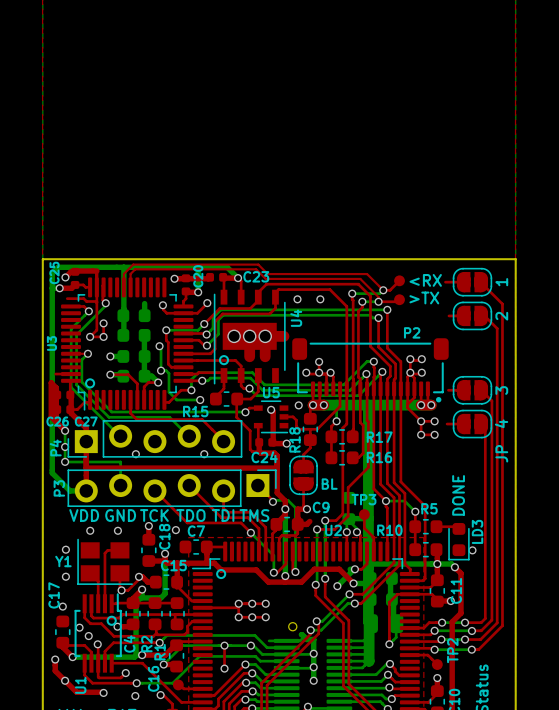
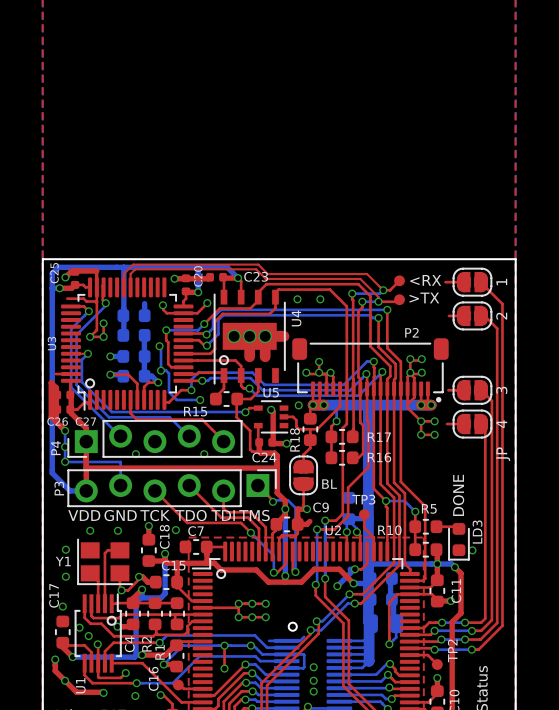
bottom track: (301, 634) (306, 639) (313, 639) (313, 680) -> none
bottom track: (313, 653) (303, 654) -> none
via position: (313, 653) -> (313, 691)
bottom track: (313, 667) (303, 668) -> (303, 654) (303, 668)

